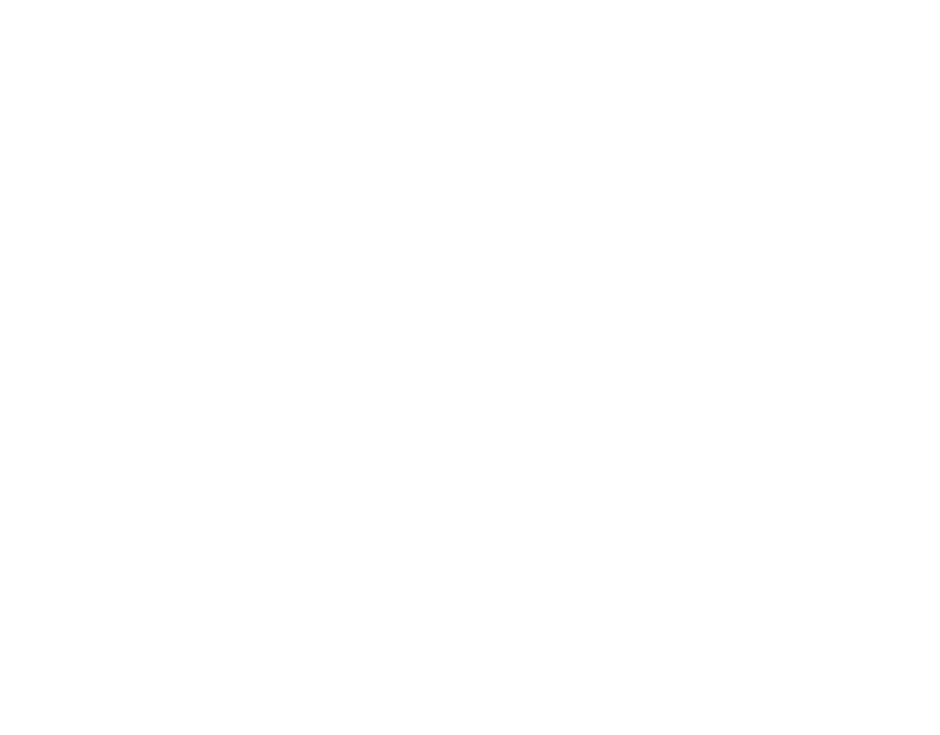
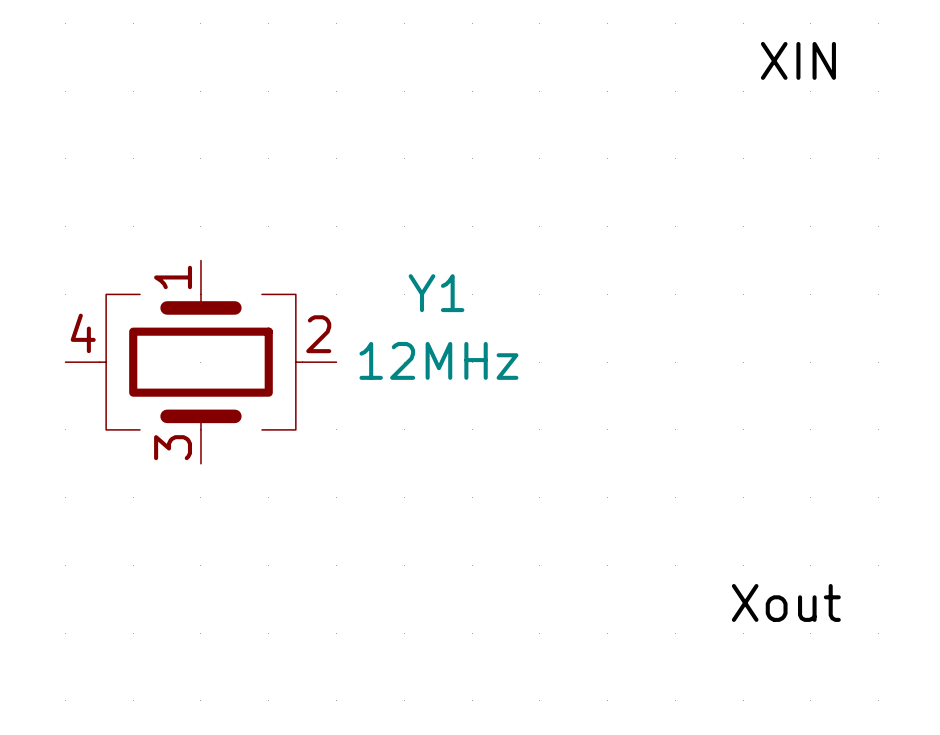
label: none -> XIN (798, 60)
Y1: none -> 12MHz (200, 362)
label: none -> Xout (786, 602)

